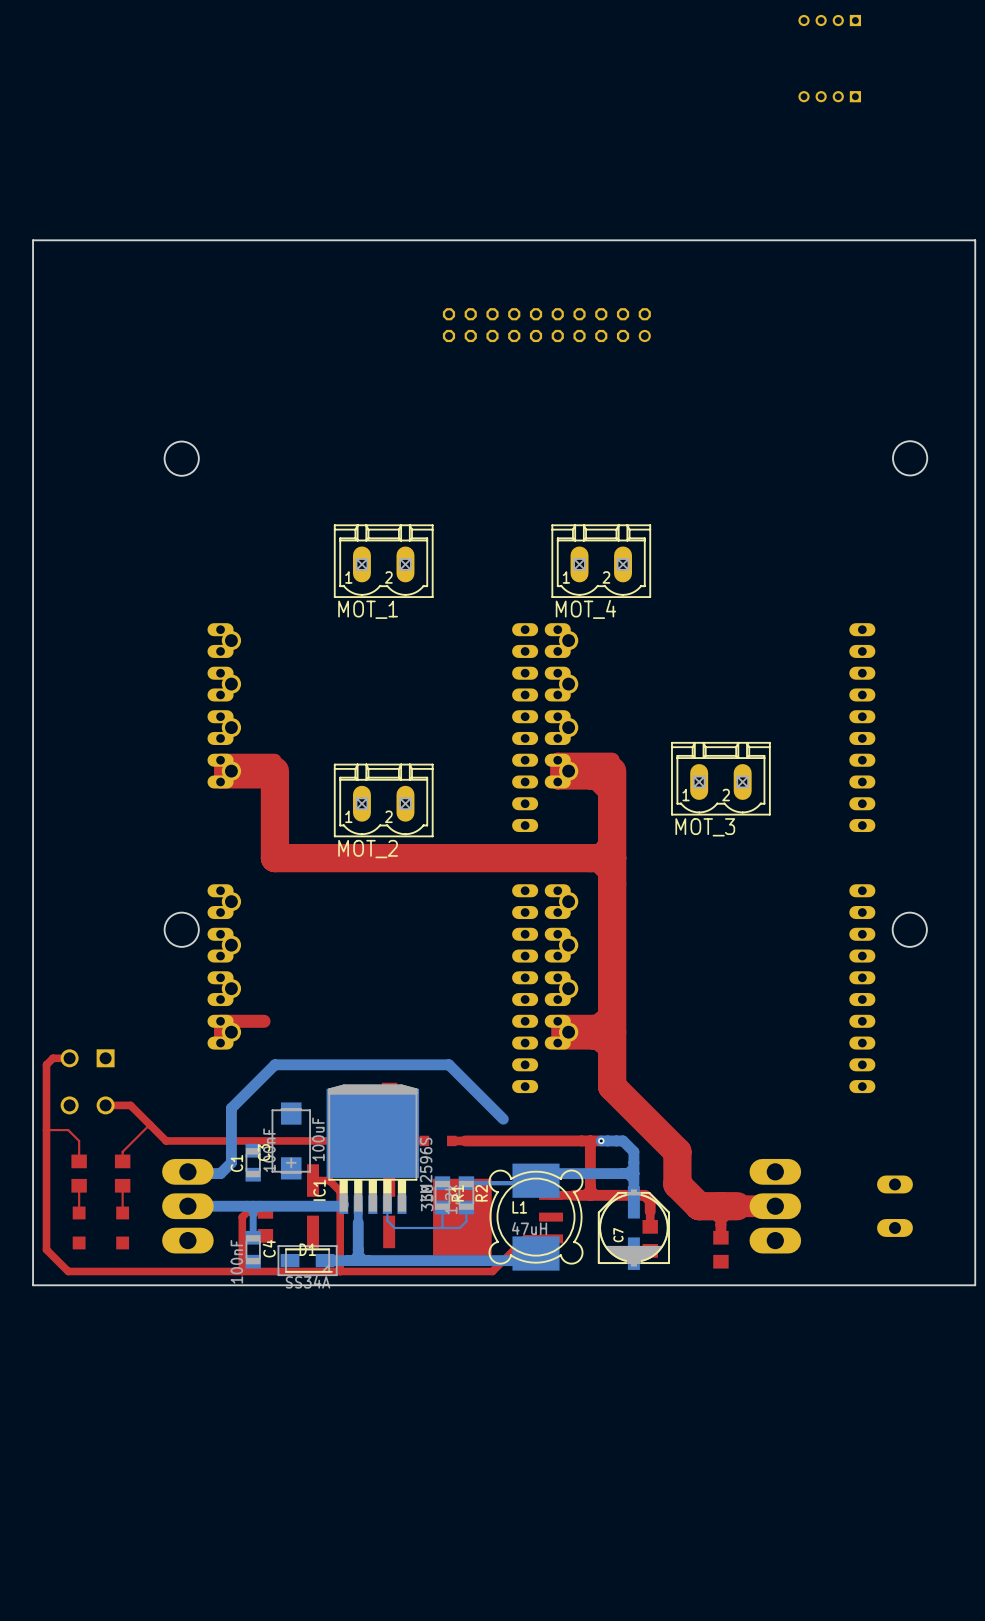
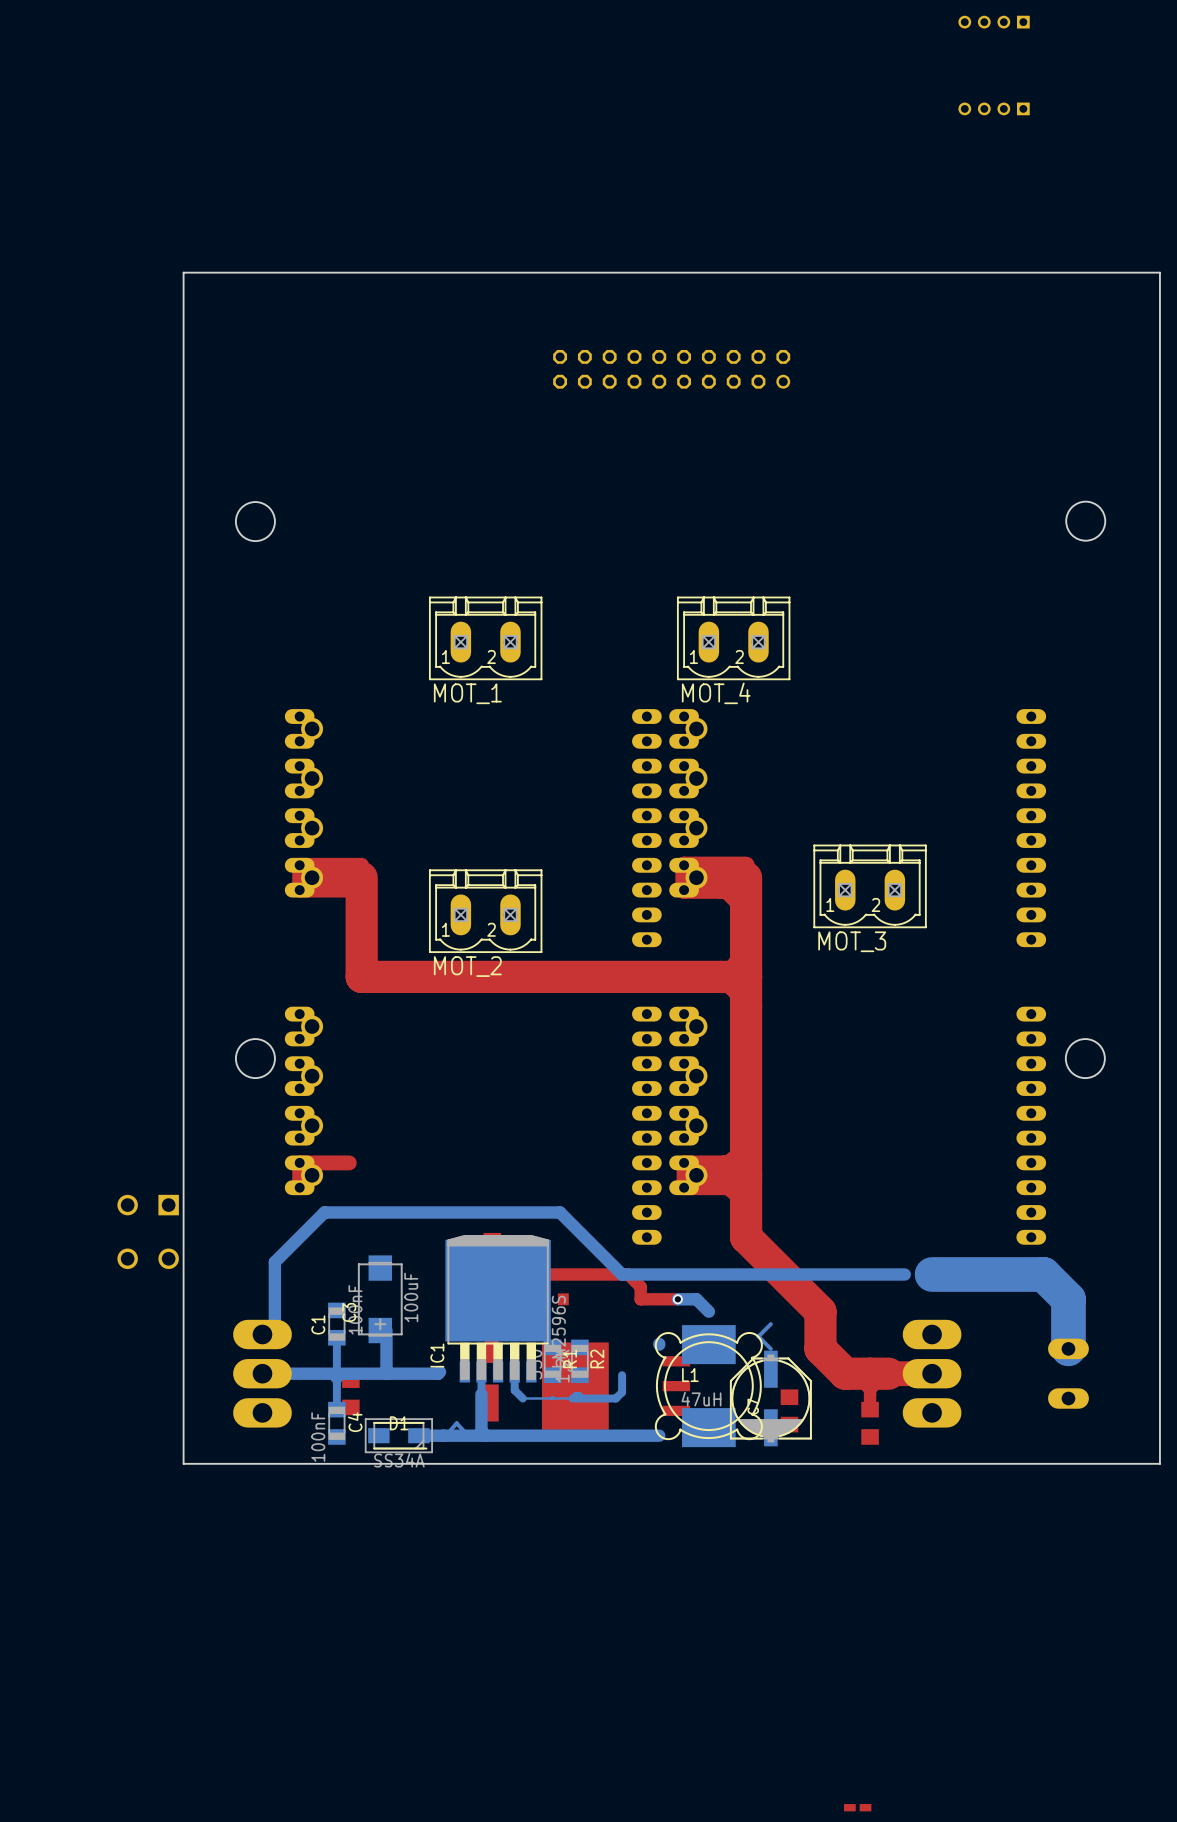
board edge: (118, 240) (33, 240) (33, 1285) (118, 1285) -> (183, 272) (183, 1463)
top track: (69, 1058) (53, 1058) (46, 1064) (46, 1249) (68, 1271) (492, 1271) (525, 1238) (551, 1238) -> none
bottom track: (274, 1064) (231, 1108) (231, 1162) (220, 1173) (189, 1173) (187, 1171) -> (361, 1212) (324, 1212) (274, 1262) (274, 1334)
top track: (105, 1105) (130, 1105) (166, 1140) (424, 1140) -> none
bottom track: none -> (904, 1274) (622, 1274)
bottom track: none -> (932, 1274) (1043, 1274) (1068, 1299) (1068, 1348)
top track: (149, 1124) (122, 1151) (122, 1161) -> none
top track: (46, 1130) (68, 1130) (79, 1140) (79, 1161) -> none
top track: (519, 1140) (451, 1140) -> (640, 1299) (640, 1286) (628, 1274) (510, 1274)
bottom track: none -> (677, 1299) (696, 1299) (708, 1311)
via: none -> (677, 1299)
top track: (590, 1140) (590, 1195) -> none
top track: (601, 1140) (552, 1140) -> none
bottom track: (601, 1140) (623, 1140) (633, 1151) (633, 1208) -> none
via: (601, 1140) -> none
IC1 position: (372, 1149) -> (498, 1308)
bottom track: none -> (386, 1330) (386, 1373)
part: (79, 1173) -> none
part: (122, 1173) -> none
bottom track: (633, 1173) (542, 1173) (532, 1183) (466, 1183) (467, 1184) -> none
bottom track: none -> (336, 1337) (336, 1373)
top track: (313, 1180) (329, 1180) (340, 1191) (340, 1271) -> none
top track: (79, 1185) (79, 1212) -> none
top track: (122, 1185) (122, 1212) -> none
top track: (551, 1195) (644, 1195) (650, 1200) (650, 1226) -> none
bottom track: (358, 1204) (358, 1260) -> none
bottom track: none -> (481, 1371) (481, 1431) (485, 1435)
bottom track: (387, 1204) (387, 1220) (394, 1227) (416, 1227) -> (514, 1371) (514, 1390) (522, 1398)
bottom track: (442, 1204) (442, 1227) -> none
part: (313, 1206) -> none
bottom track: (466, 1207) (466, 1221) (459, 1227) -> (622, 1375) (622, 1392) (615, 1398) (572, 1398)
top track: (265, 1211) (247, 1211) (242, 1217) (242, 1271) -> none
L1 position: (536, 1217) -> (708, 1386)
part: (79, 1227) -> none
part: (122, 1227) -> none
bottom track: none -> (584, 1398) (579, 1393) (574, 1393) (570, 1398)
part: none -> (857, 1807)

